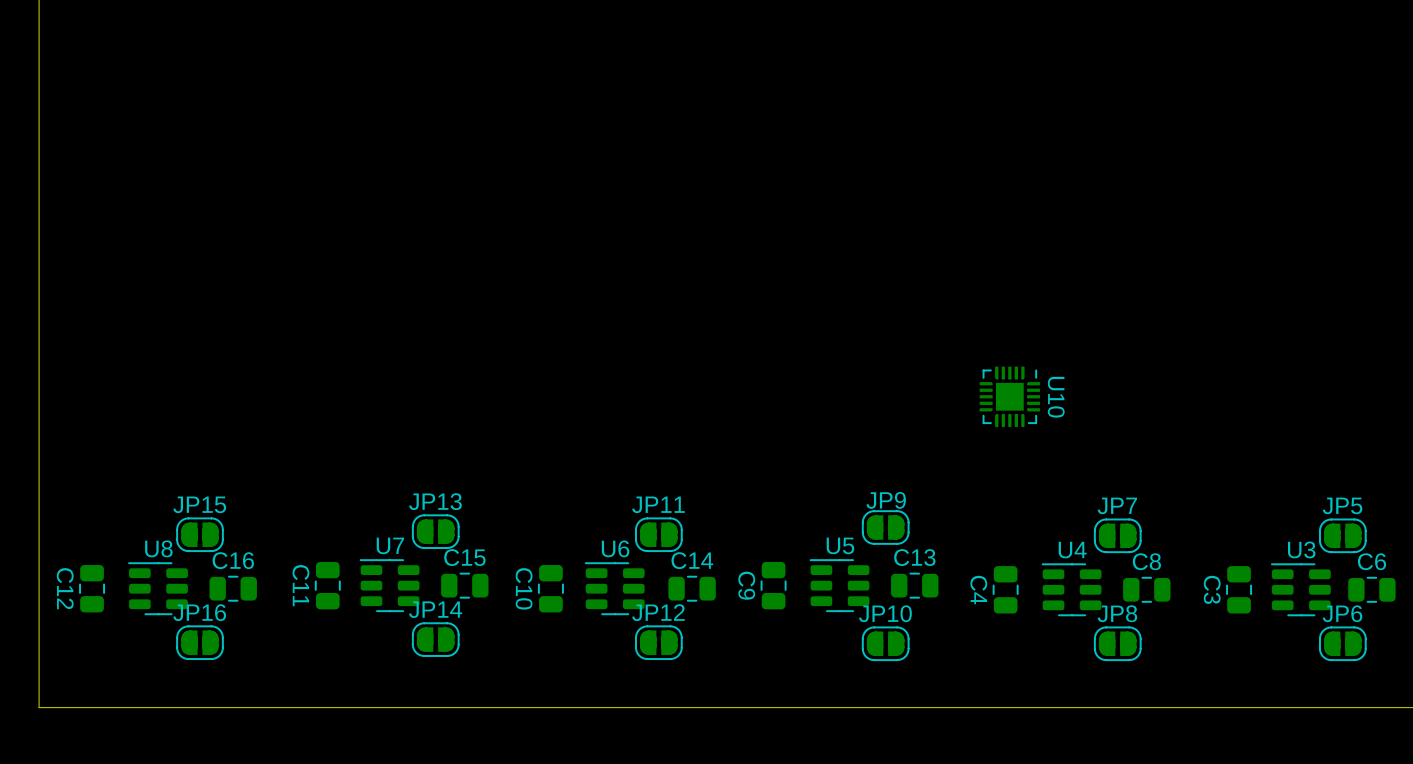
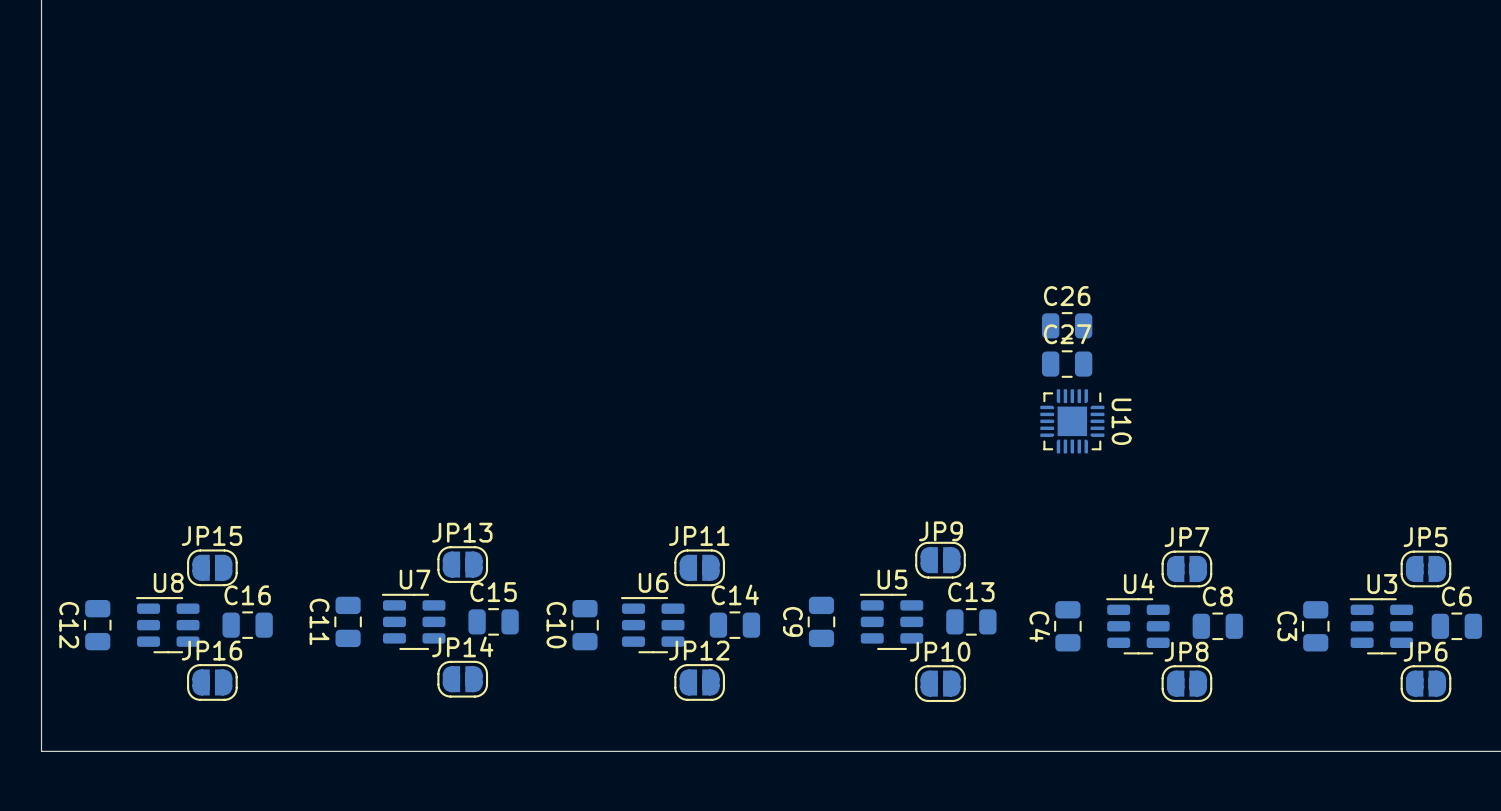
C26: none -> (1067, 325)
C27: none -> (1067, 364)

